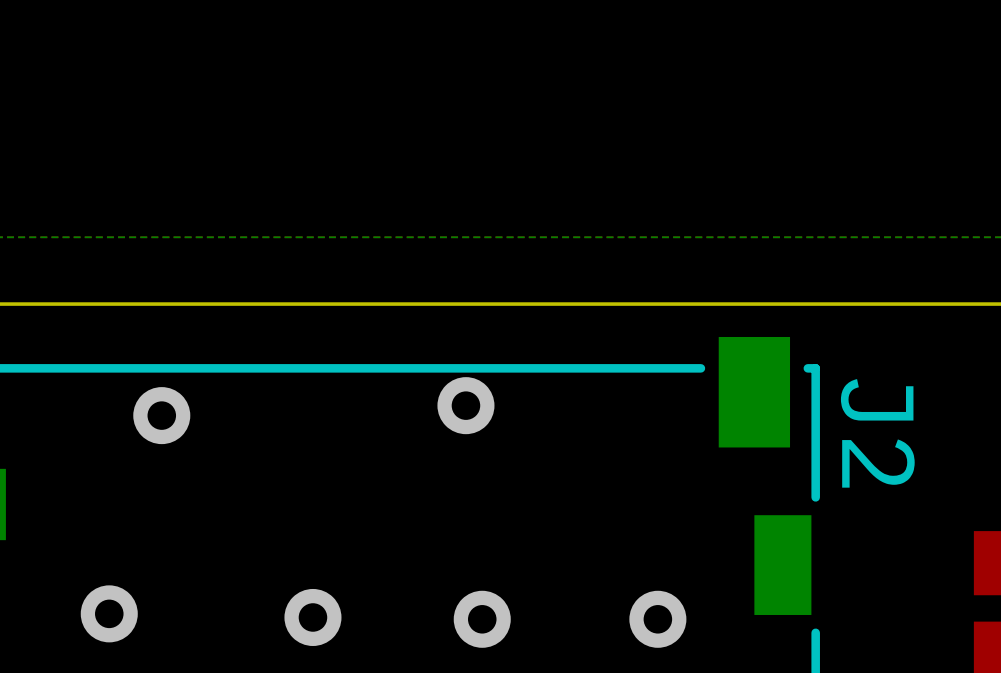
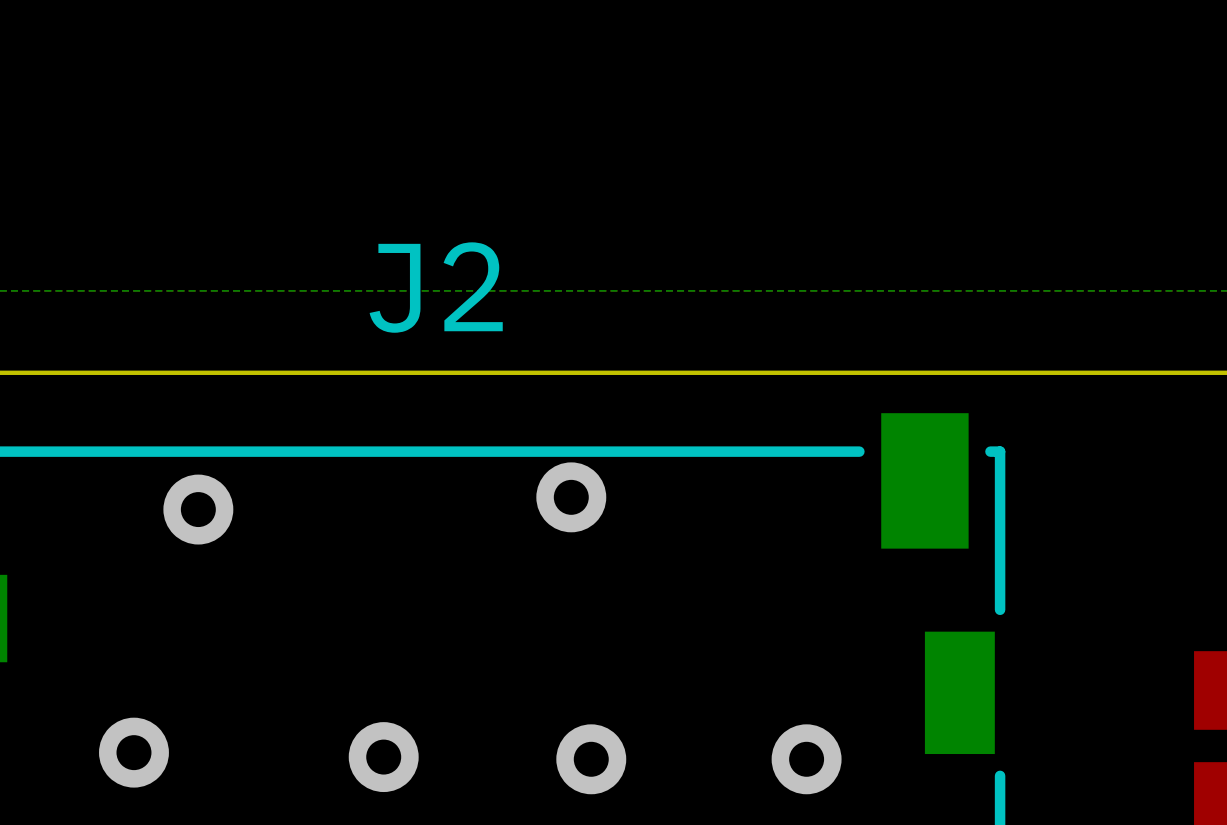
J2 name rotation: 0° (877, 433) -> 90° counterclockwise (436, 287)
J2 name position: J2 (877, 433) -> J2 (436, 287)

